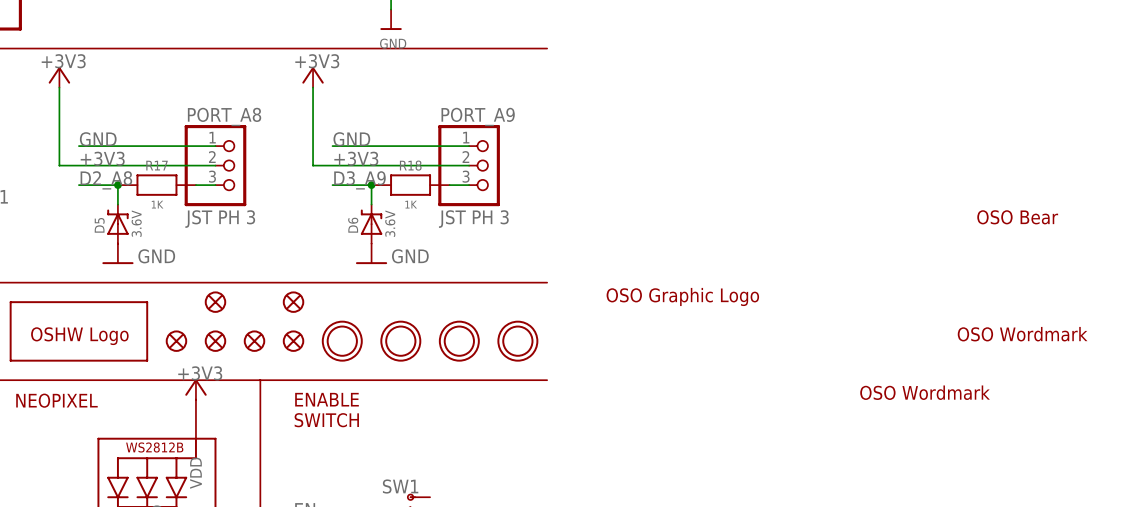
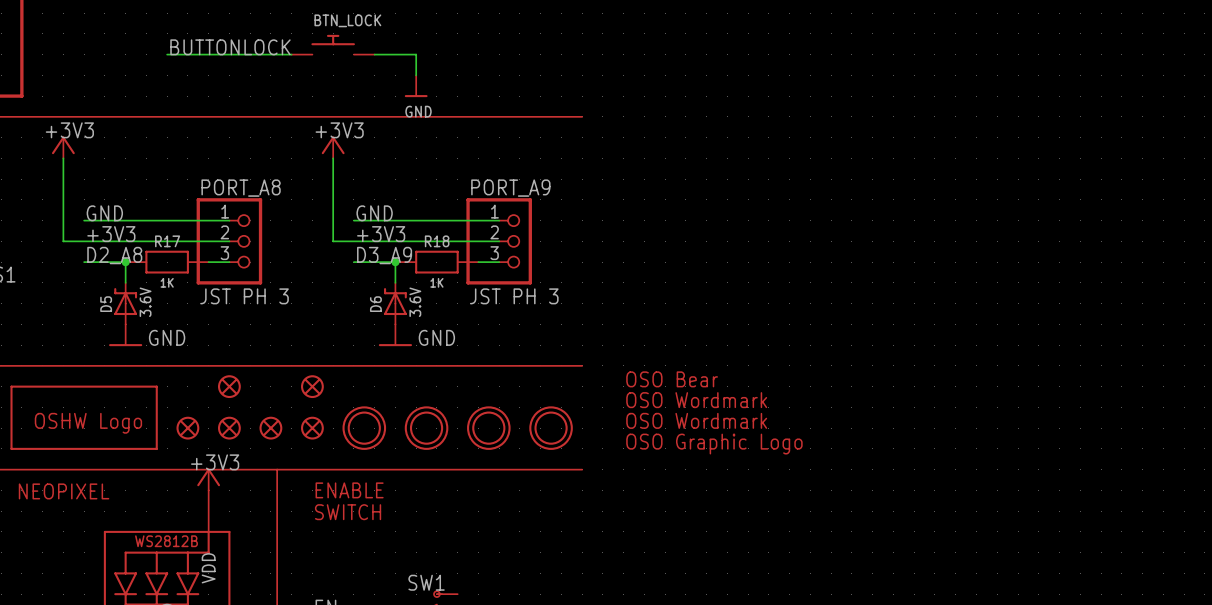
part: (1017, 217) -> none
part: none -> (672, 379)
part position: (682, 296) -> (714, 444)
part: none -> (696, 400)
part: none -> (696, 420)
part: (1022, 334) -> none
part: (925, 392) -> none

